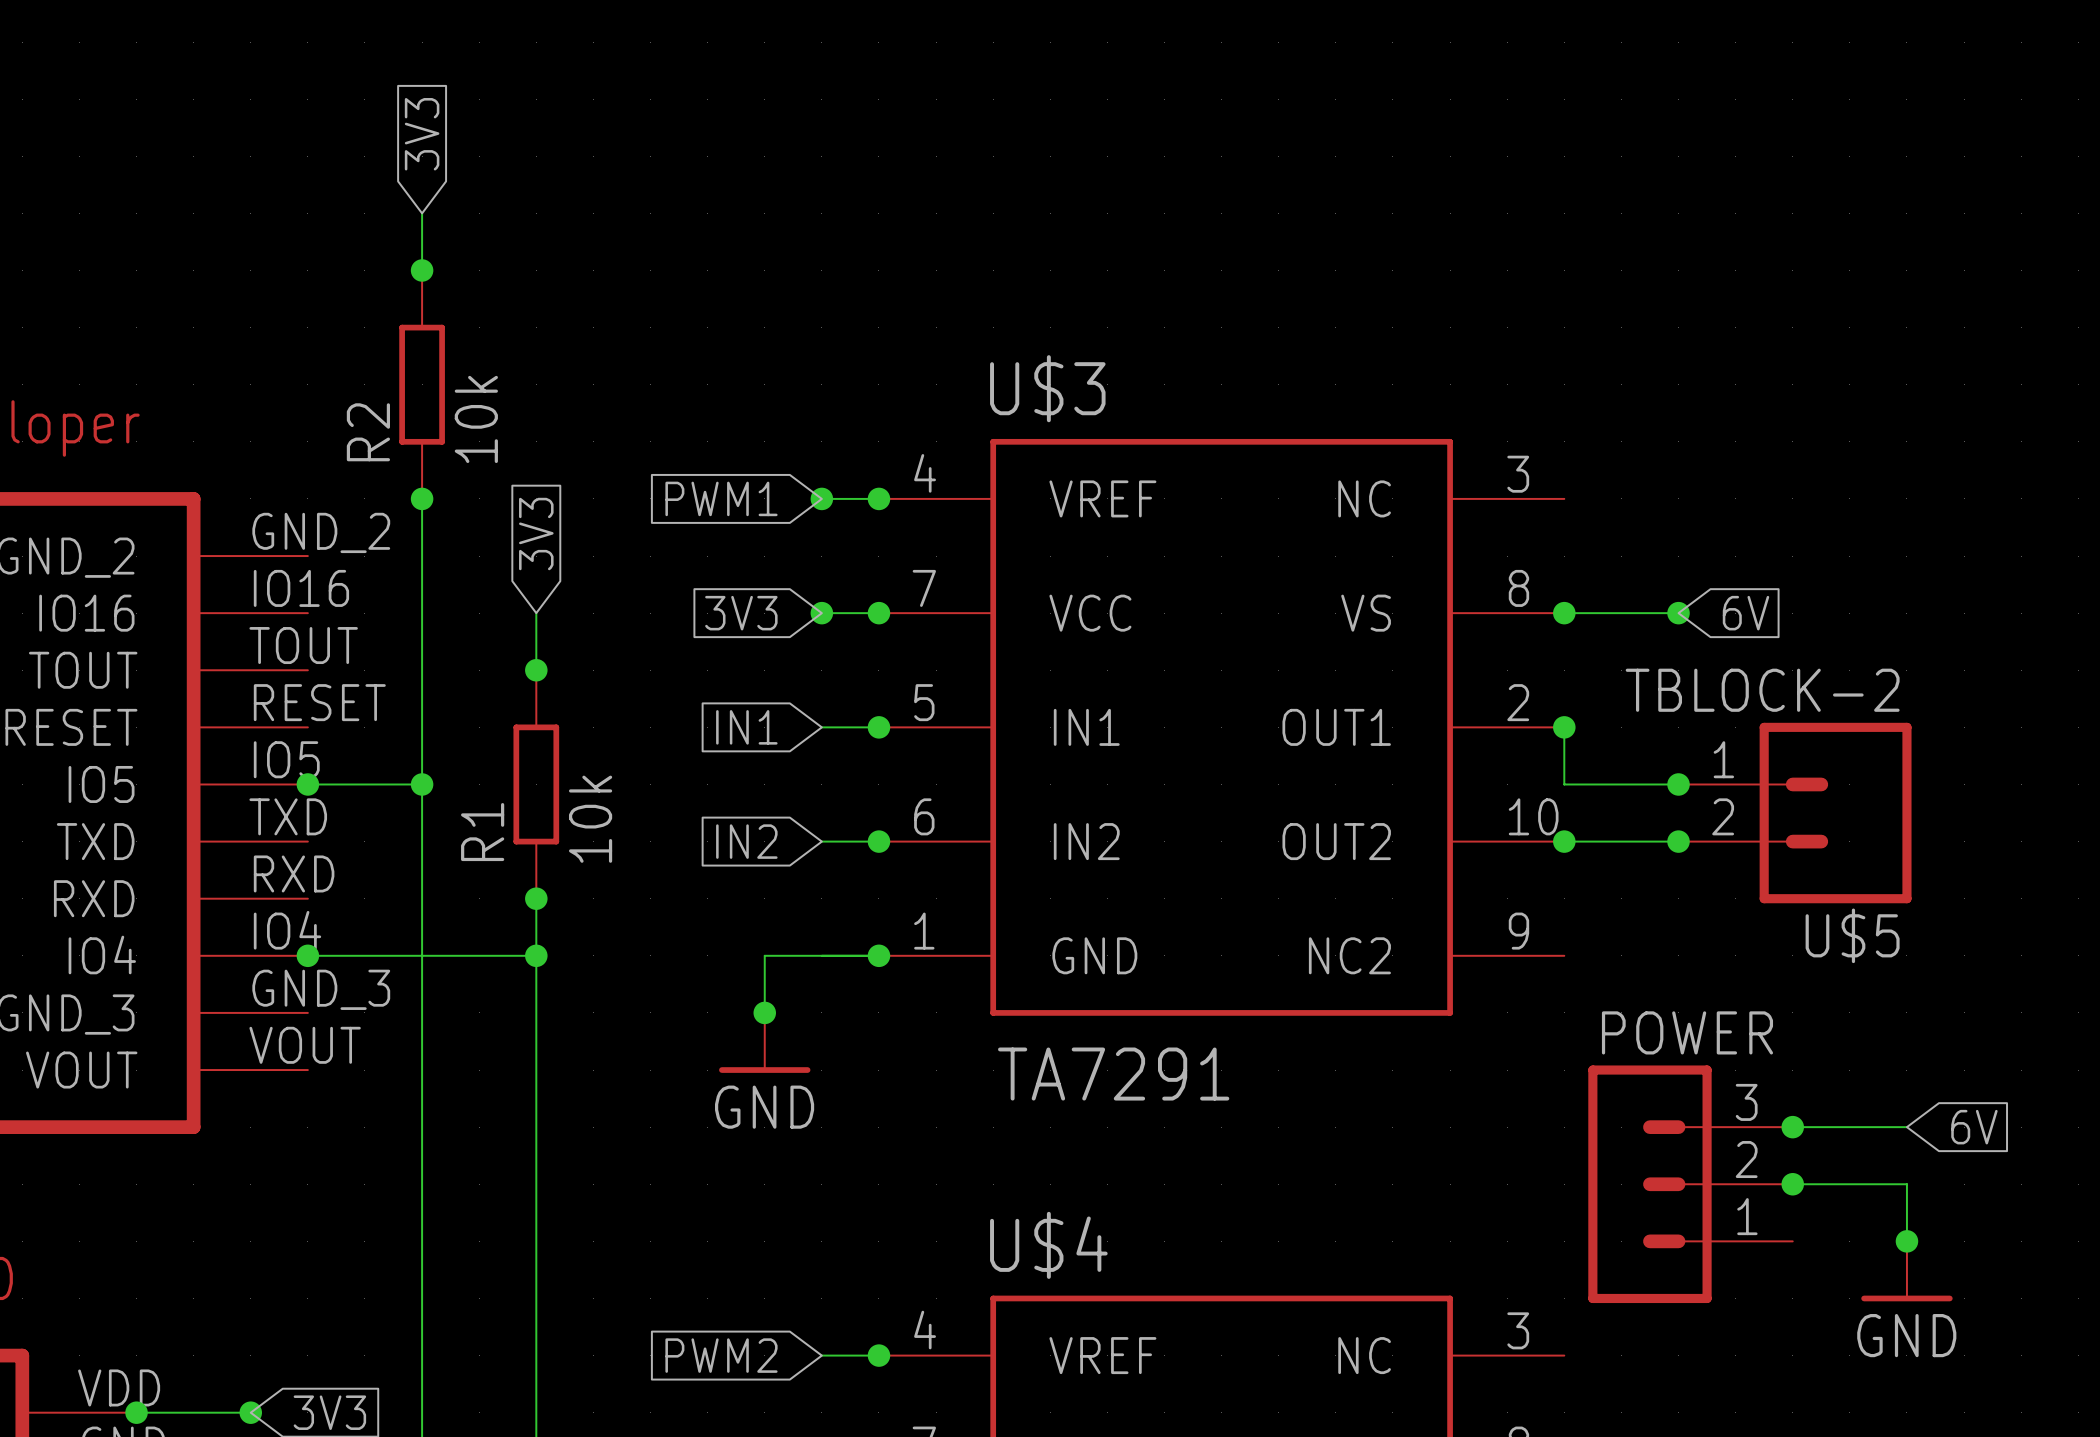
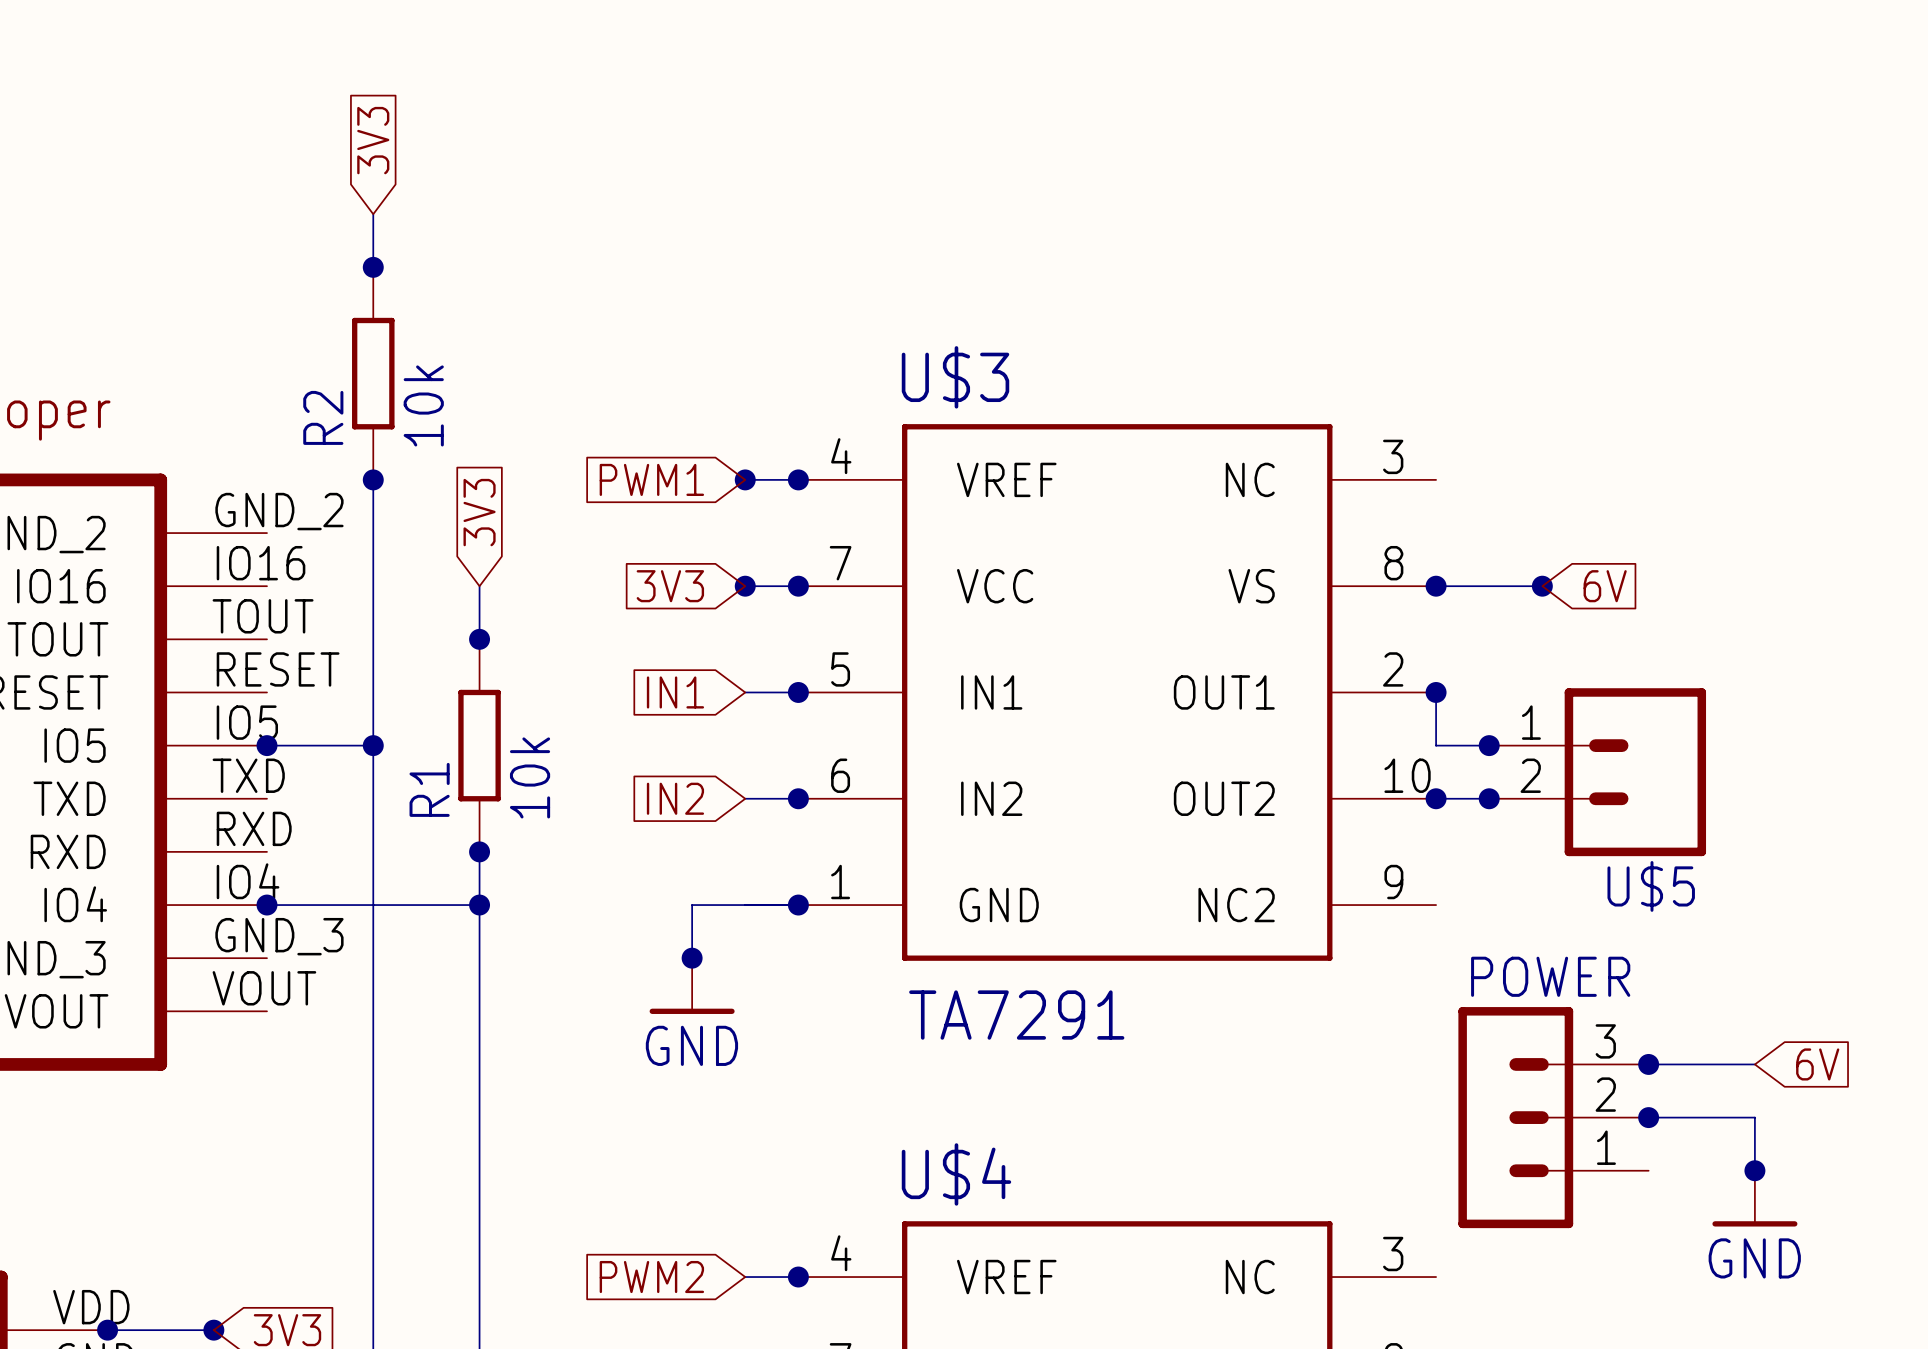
U$5 value: TBLOCK-2 (1762, 690) -> none
junction: none -> (1489, 745)
junction: (1678, 784) -> none
U$5 position: (1795, 813) -> (1597, 772)
junction: none -> (1489, 798)
junction: (1678, 841) -> none

